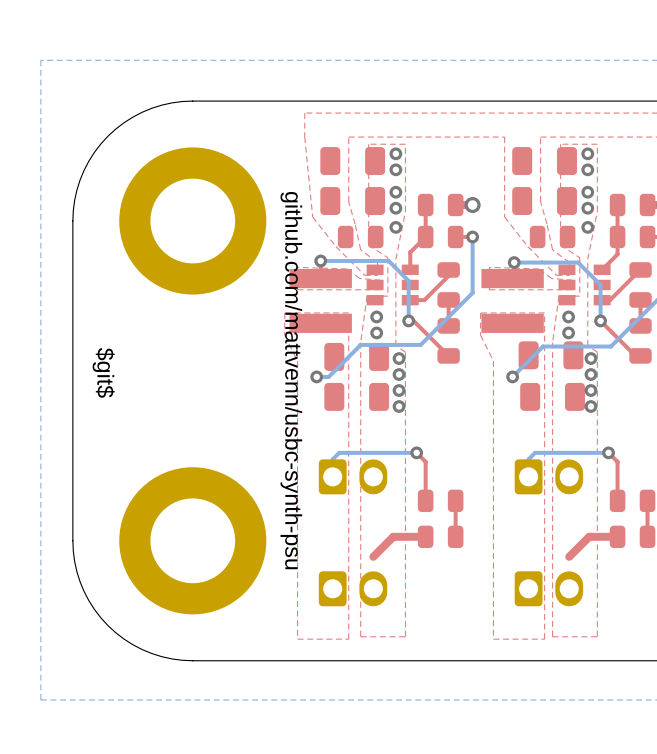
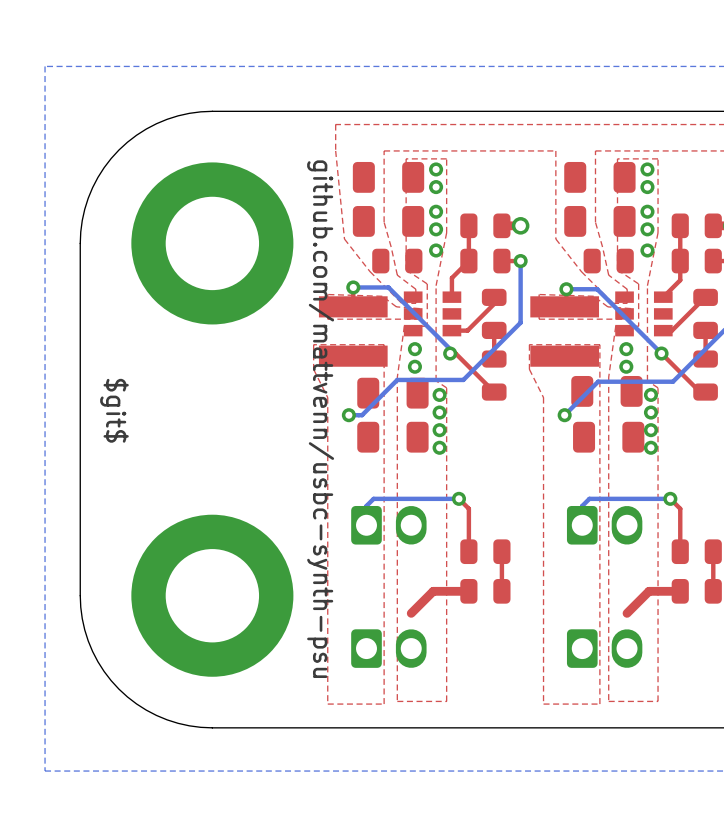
bottom track: (352, 260) (388, 260) (408, 280) (408, 320) -> (388, 287) (450, 349)
bottom track: (542, 262) (578, 262) (600, 284) (600, 320) -> (597, 289) (657, 349)

